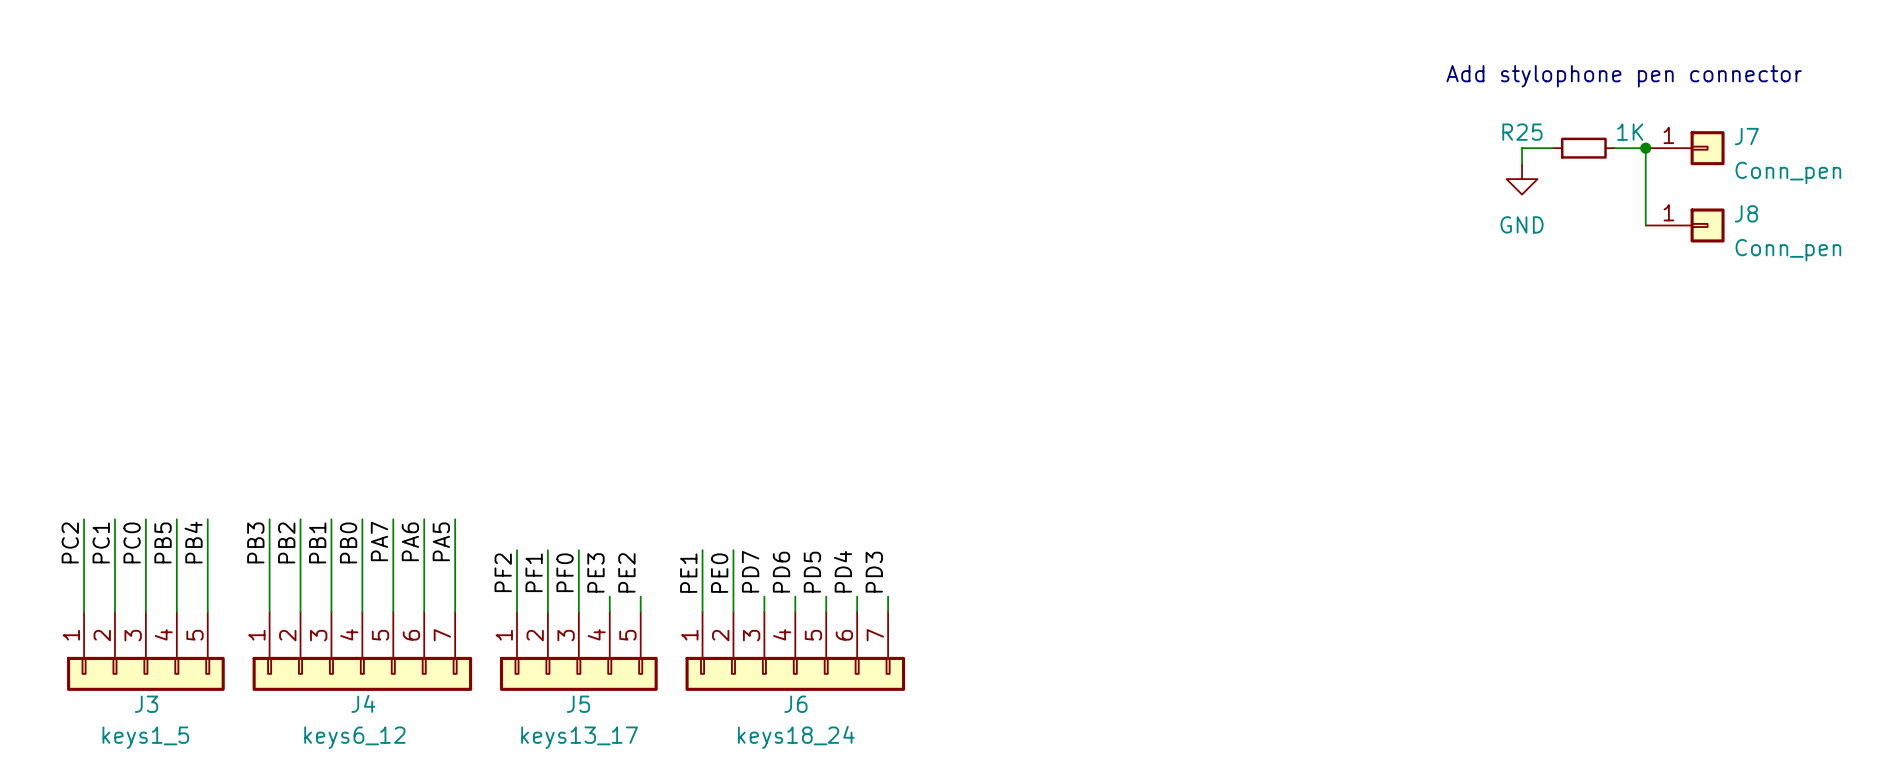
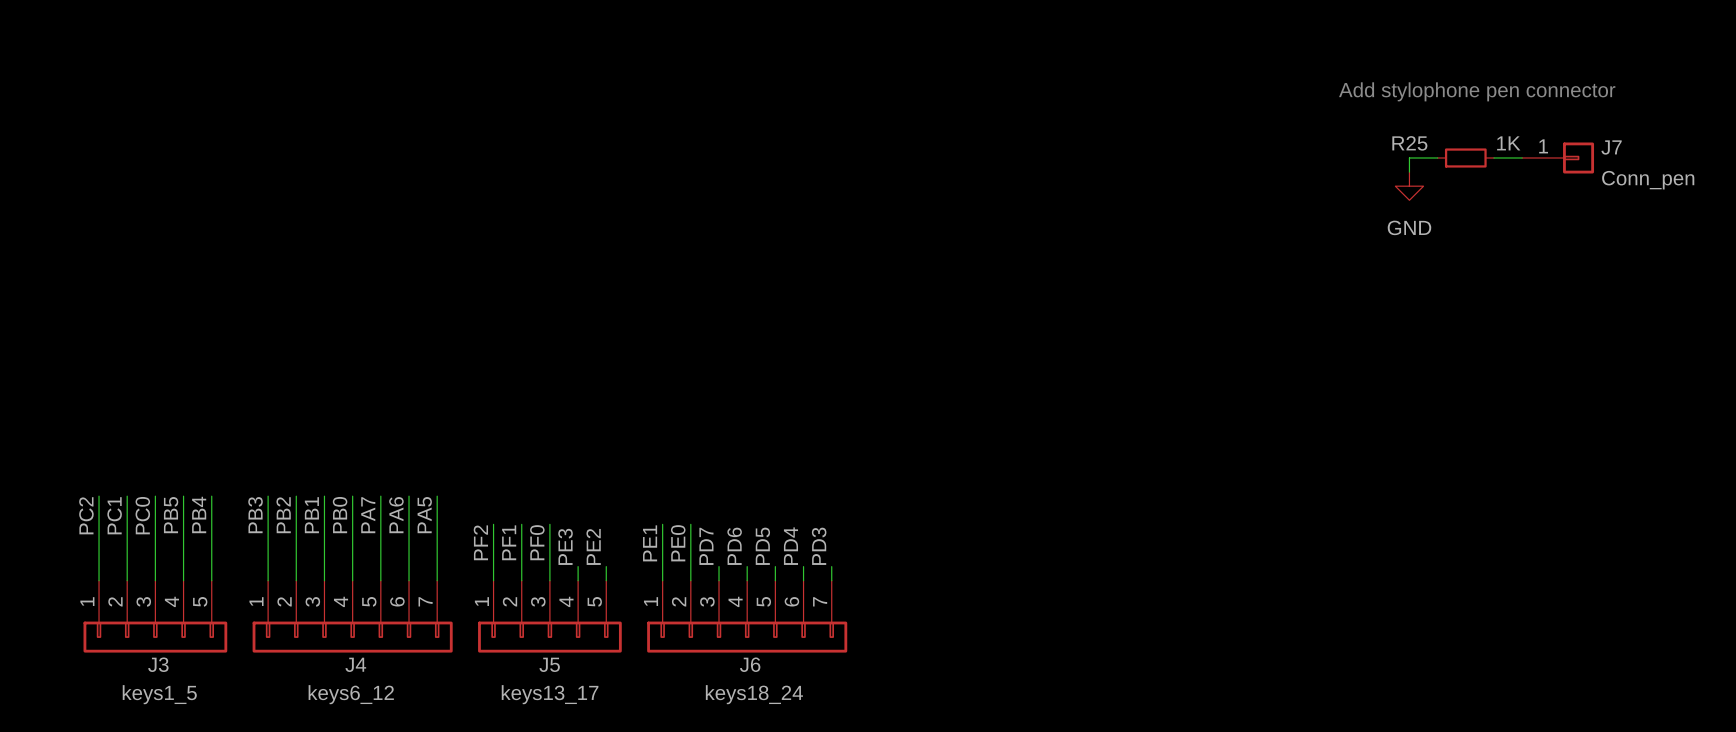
wire: (1645, 148) (1645, 225) -> none
junction: (1645, 148) -> none
J8: Conn_pen (1685, 225) -> none

